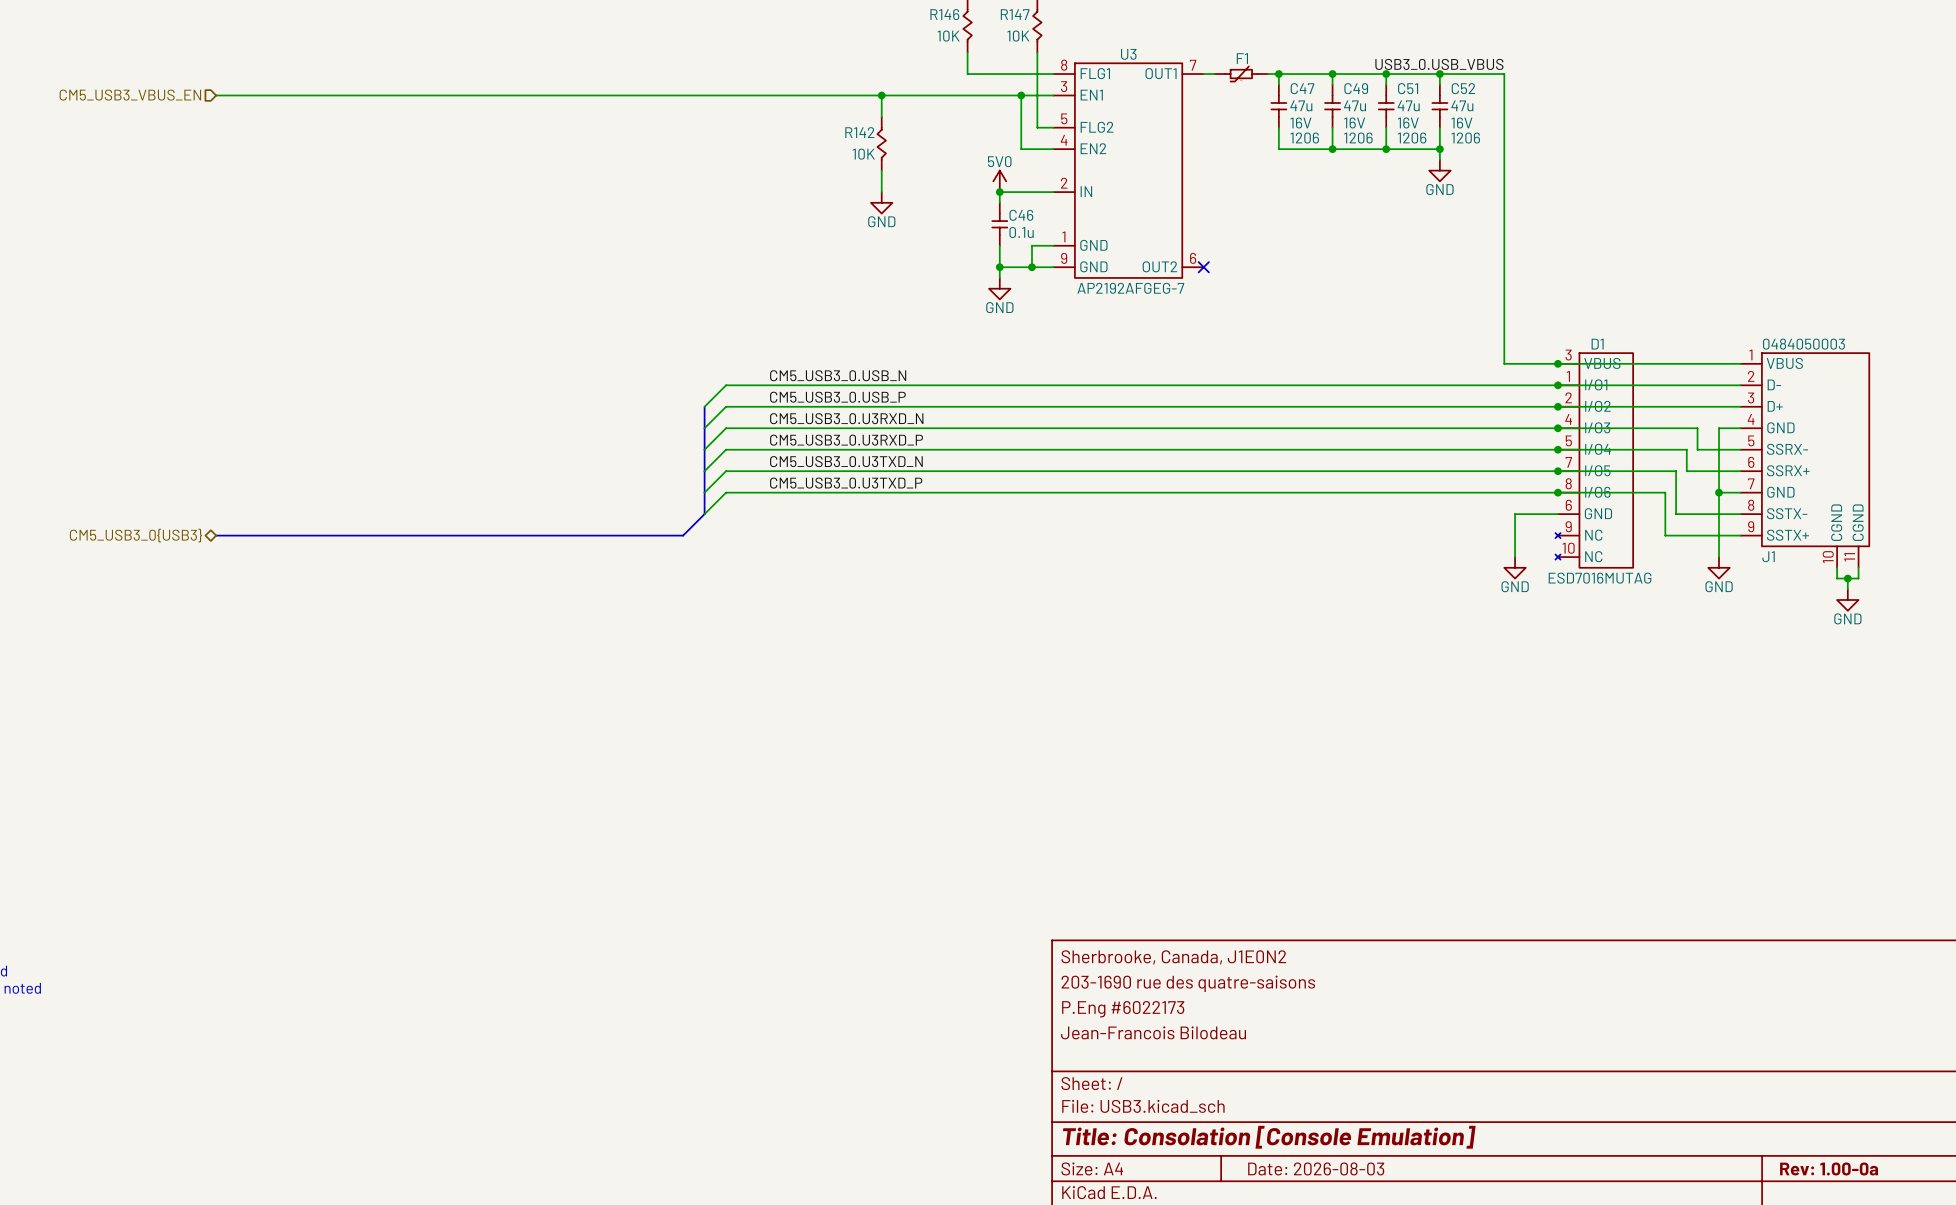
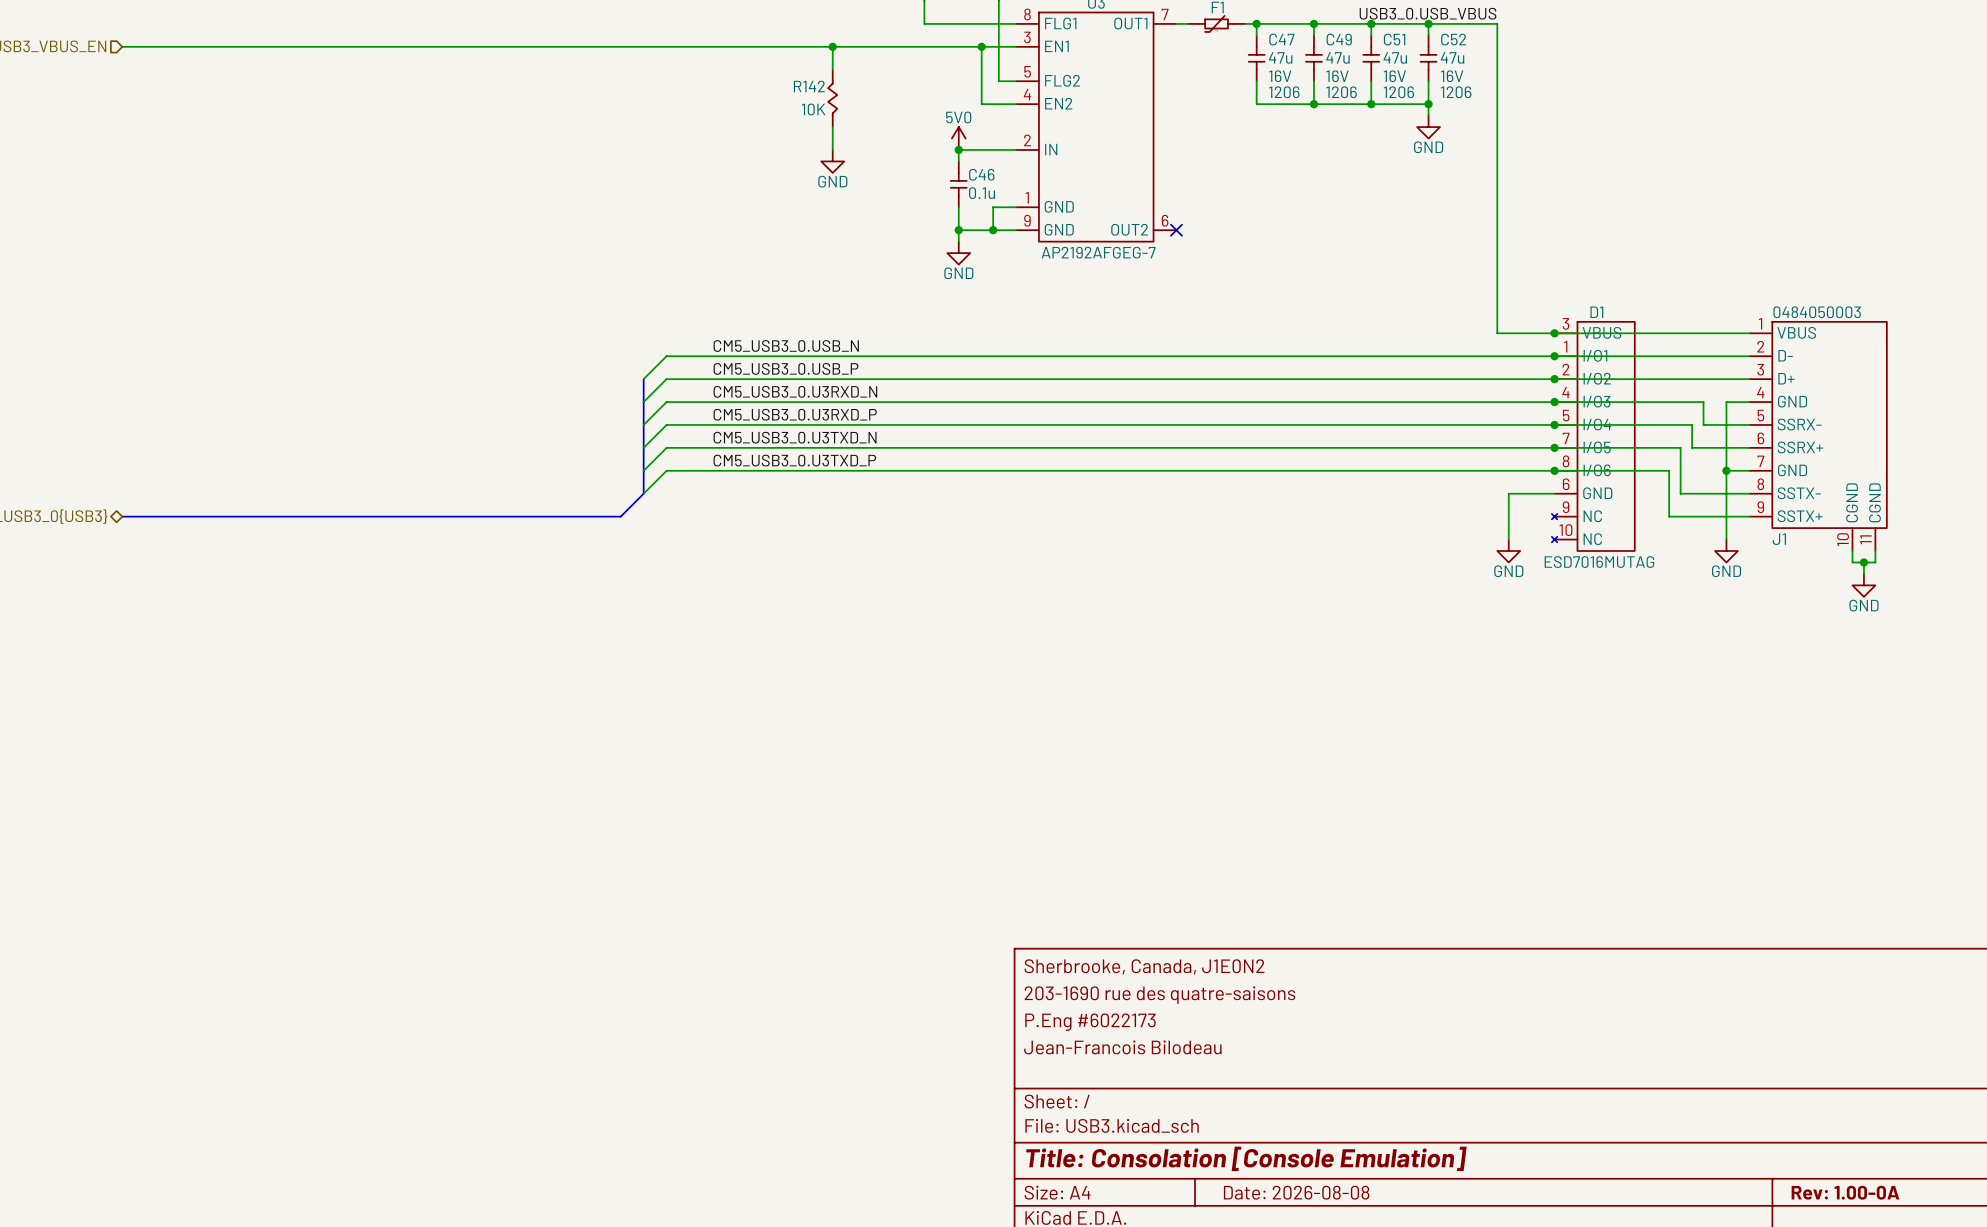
title block: Date: 2026-08-03 (1316, 1168) -> Date: 2026-08-08 (1296, 1192)
title block: Rev: 1.00-0a (1829, 1168) -> Rev: 1.00-0A (1845, 1192)

